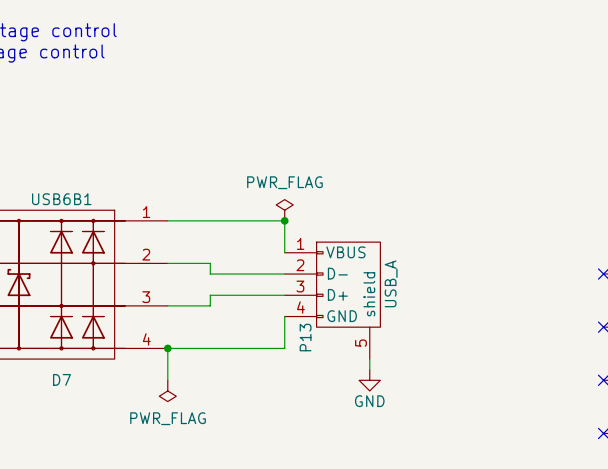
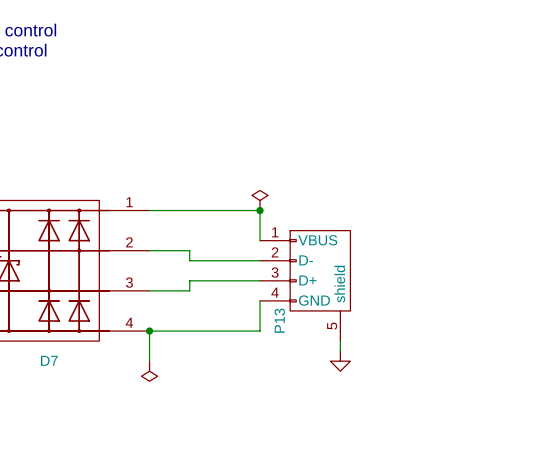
power symbol text: PWR_FLAG (284, 182) -> none
D7 value: USB6B1 (61, 199) -> none
P13 value: USB_A (391, 283) -> none
power symbol text: GND (369, 401) -> none
power symbol text: PWR_FLAG (168, 418) -> none

